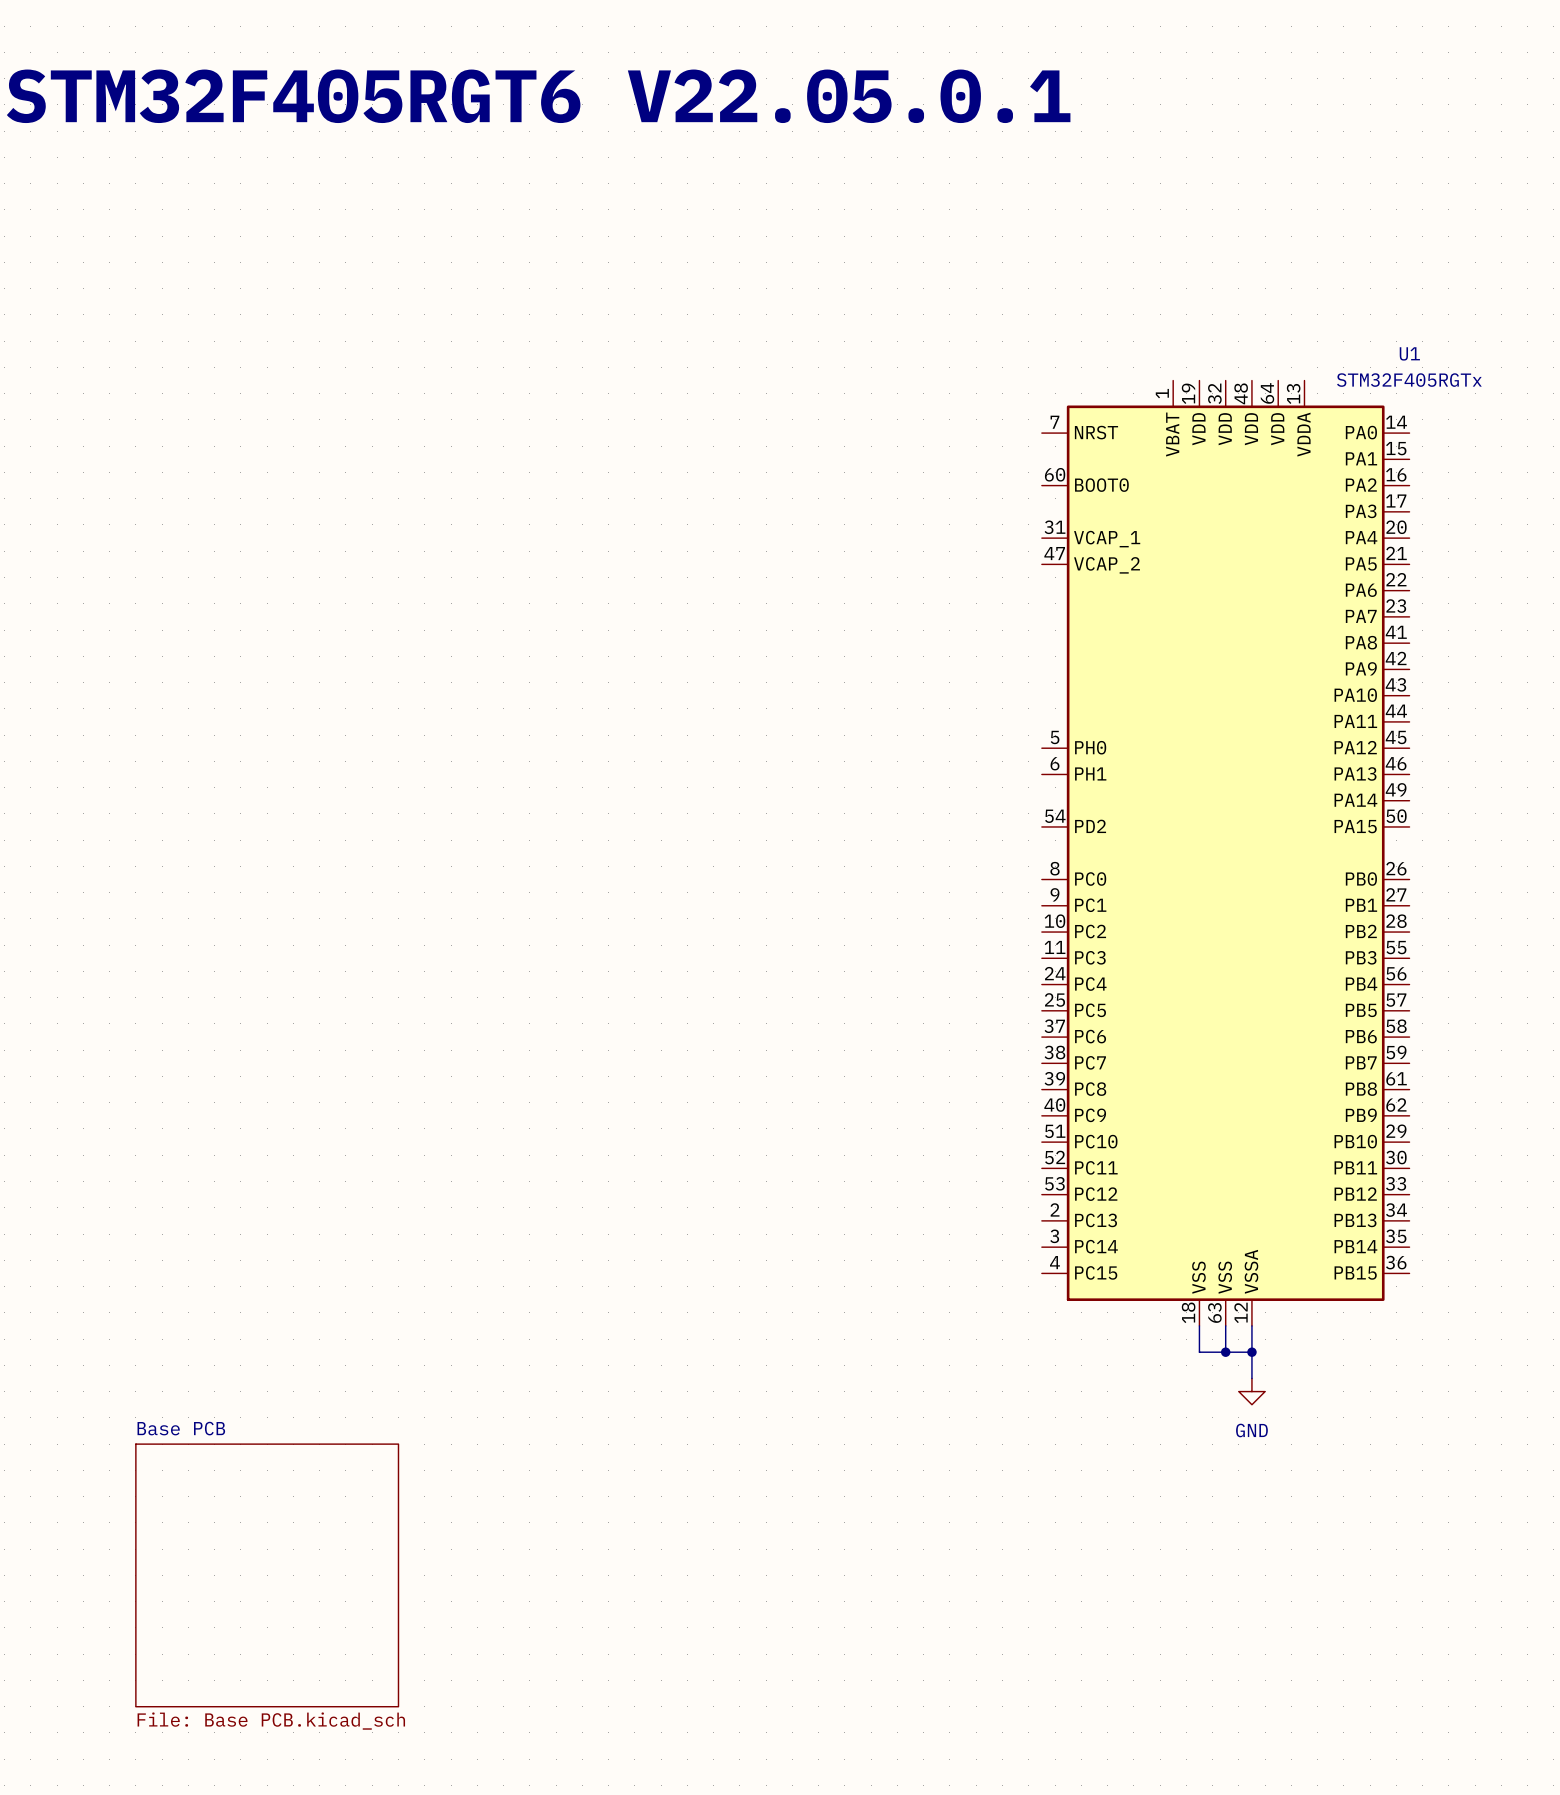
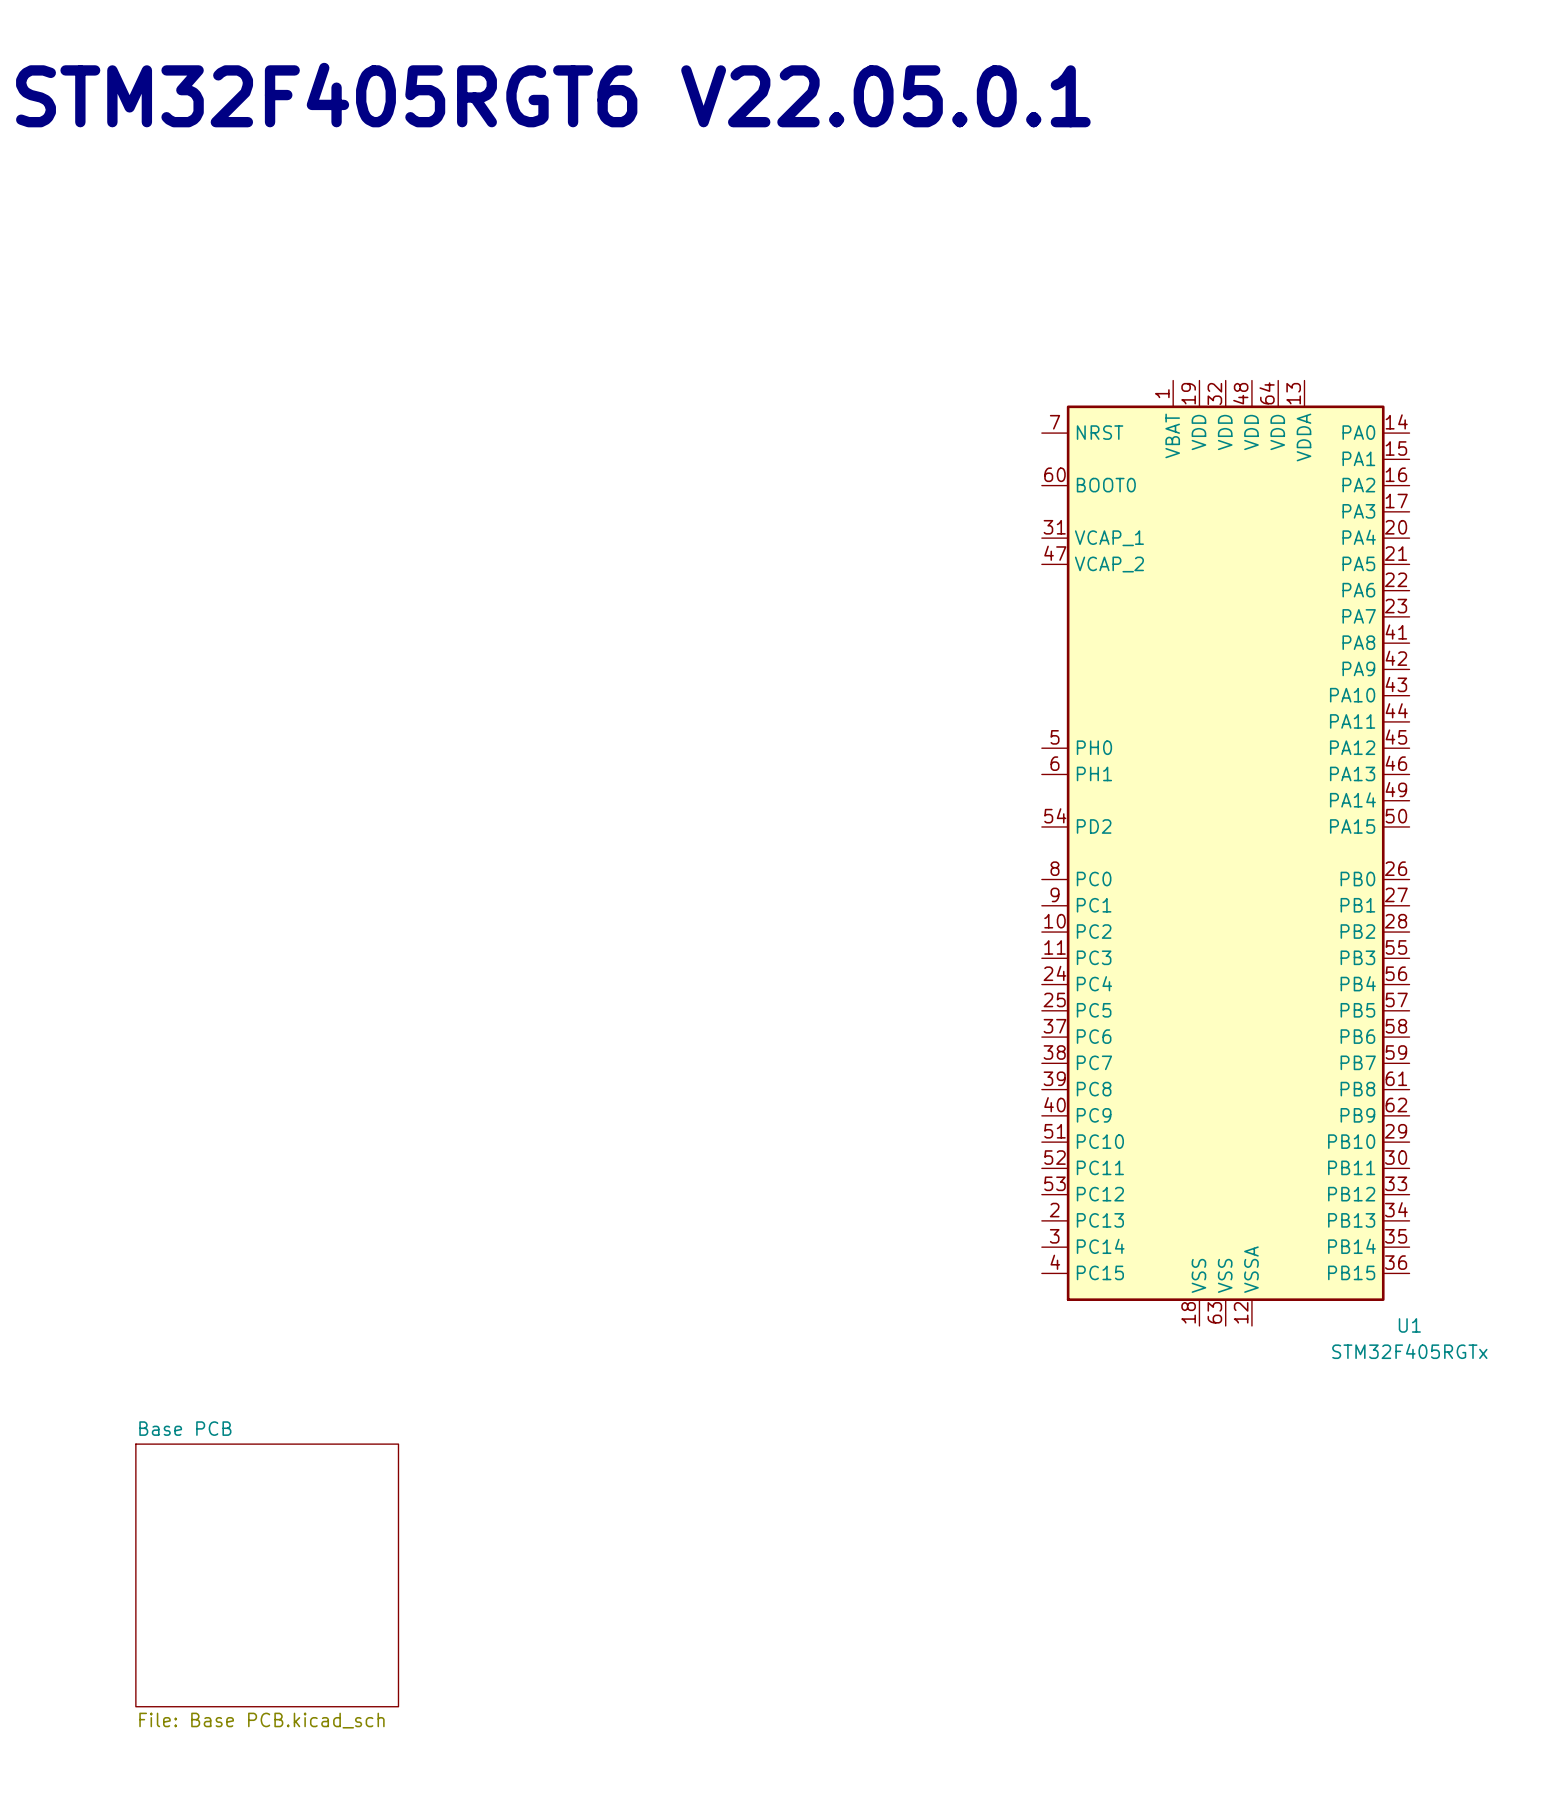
U1 name position: U1 (1409, 353) -> U1 (1409, 1325)
U1 value position: STM32F405RGTx (1409, 380) -> STM32F405RGTx (1409, 1351)
wire: (1199, 1325) (1199, 1352) (1251, 1352) -> none
wire: (1225, 1325) (1225, 1352) -> none
wire: (1251, 1325) (1251, 1378) -> none
junction: (1225, 1352) -> none
junction: (1251, 1352) -> none
power symbol: GND (1251, 1391) -> none

